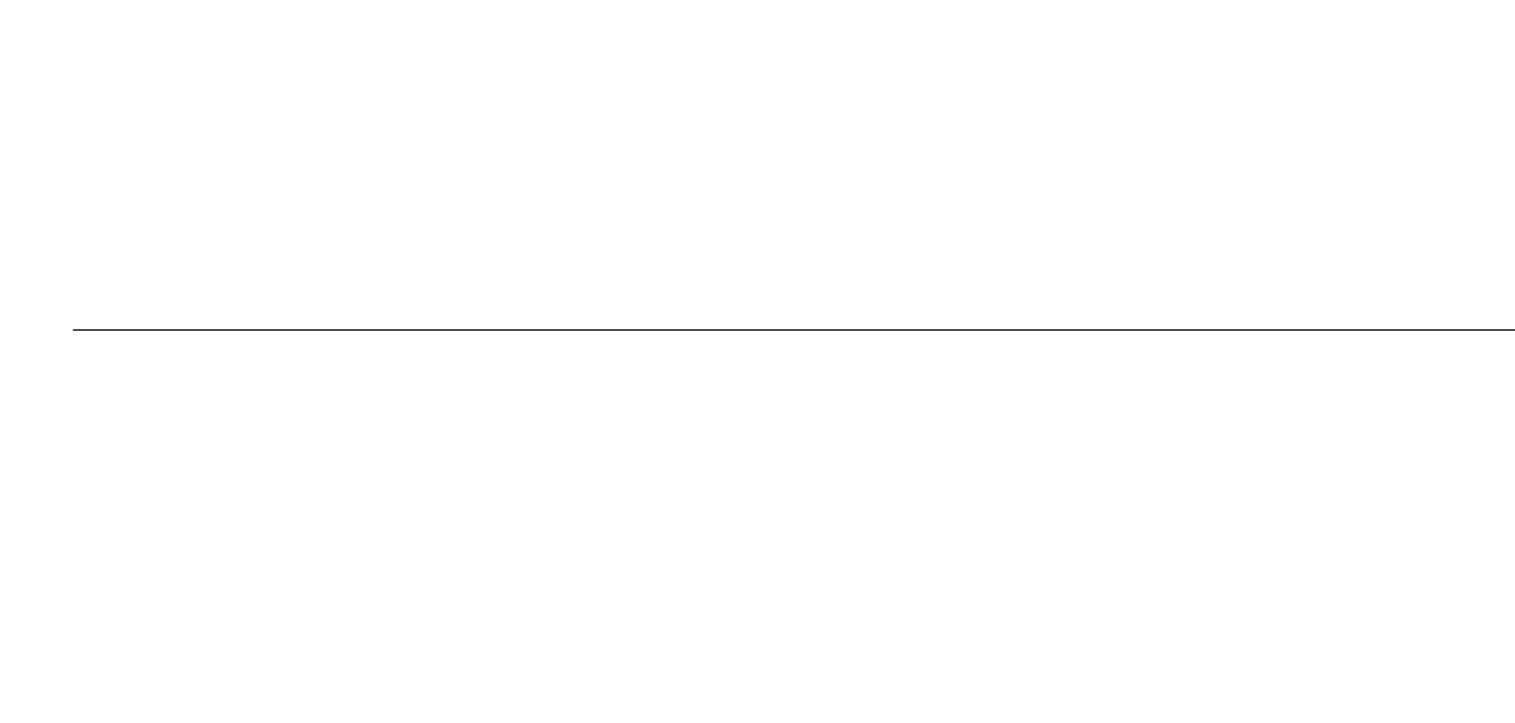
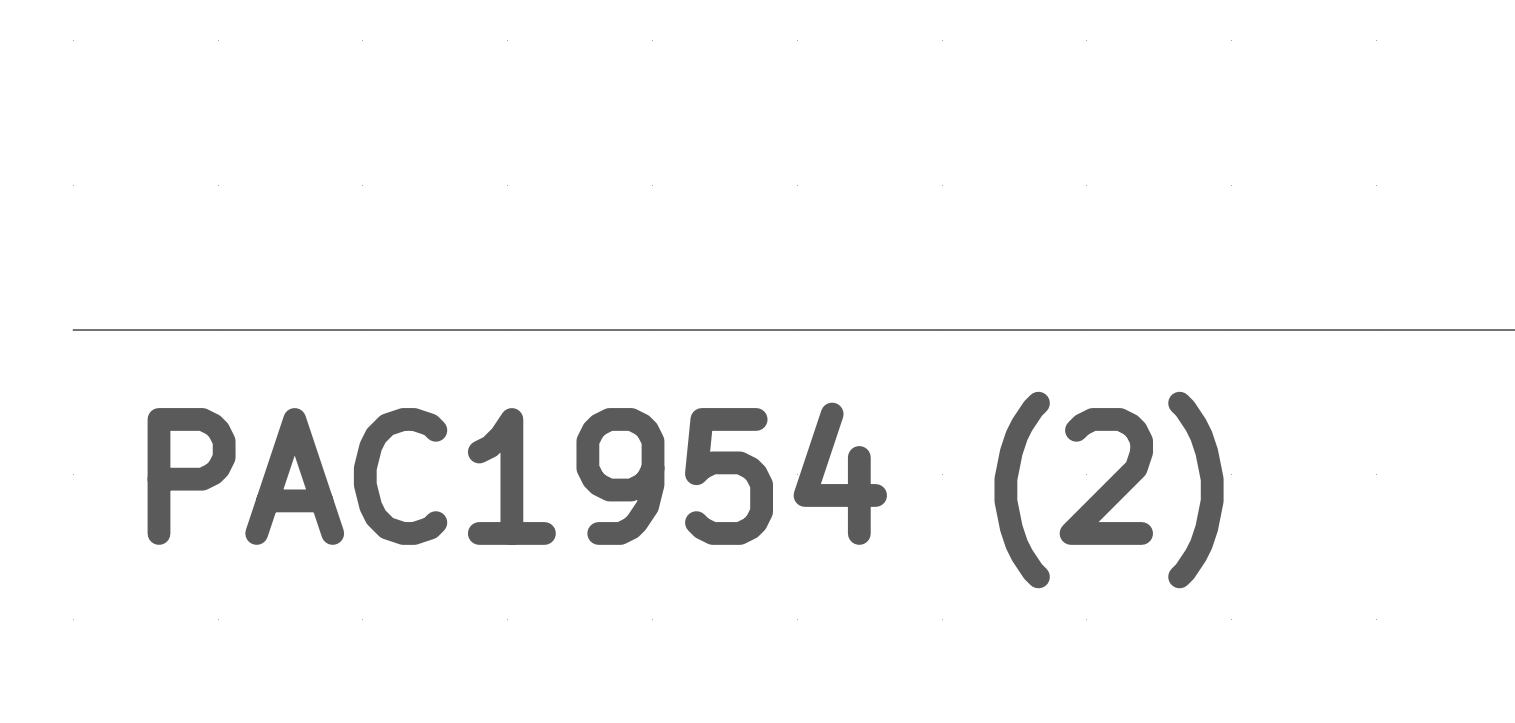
text: none -> PAC1954 (2) (685, 490)

